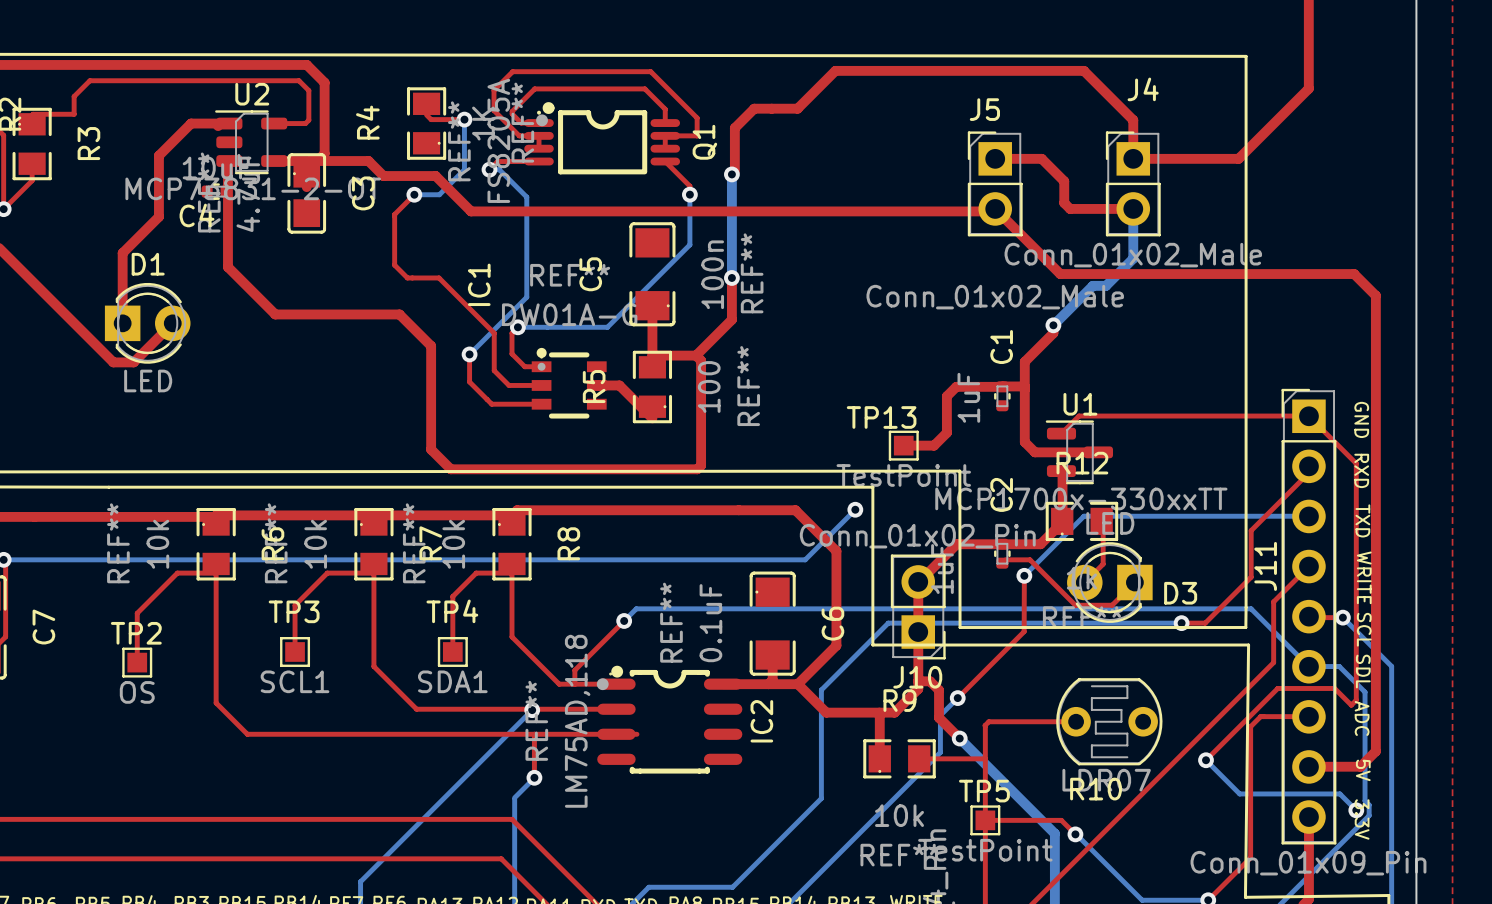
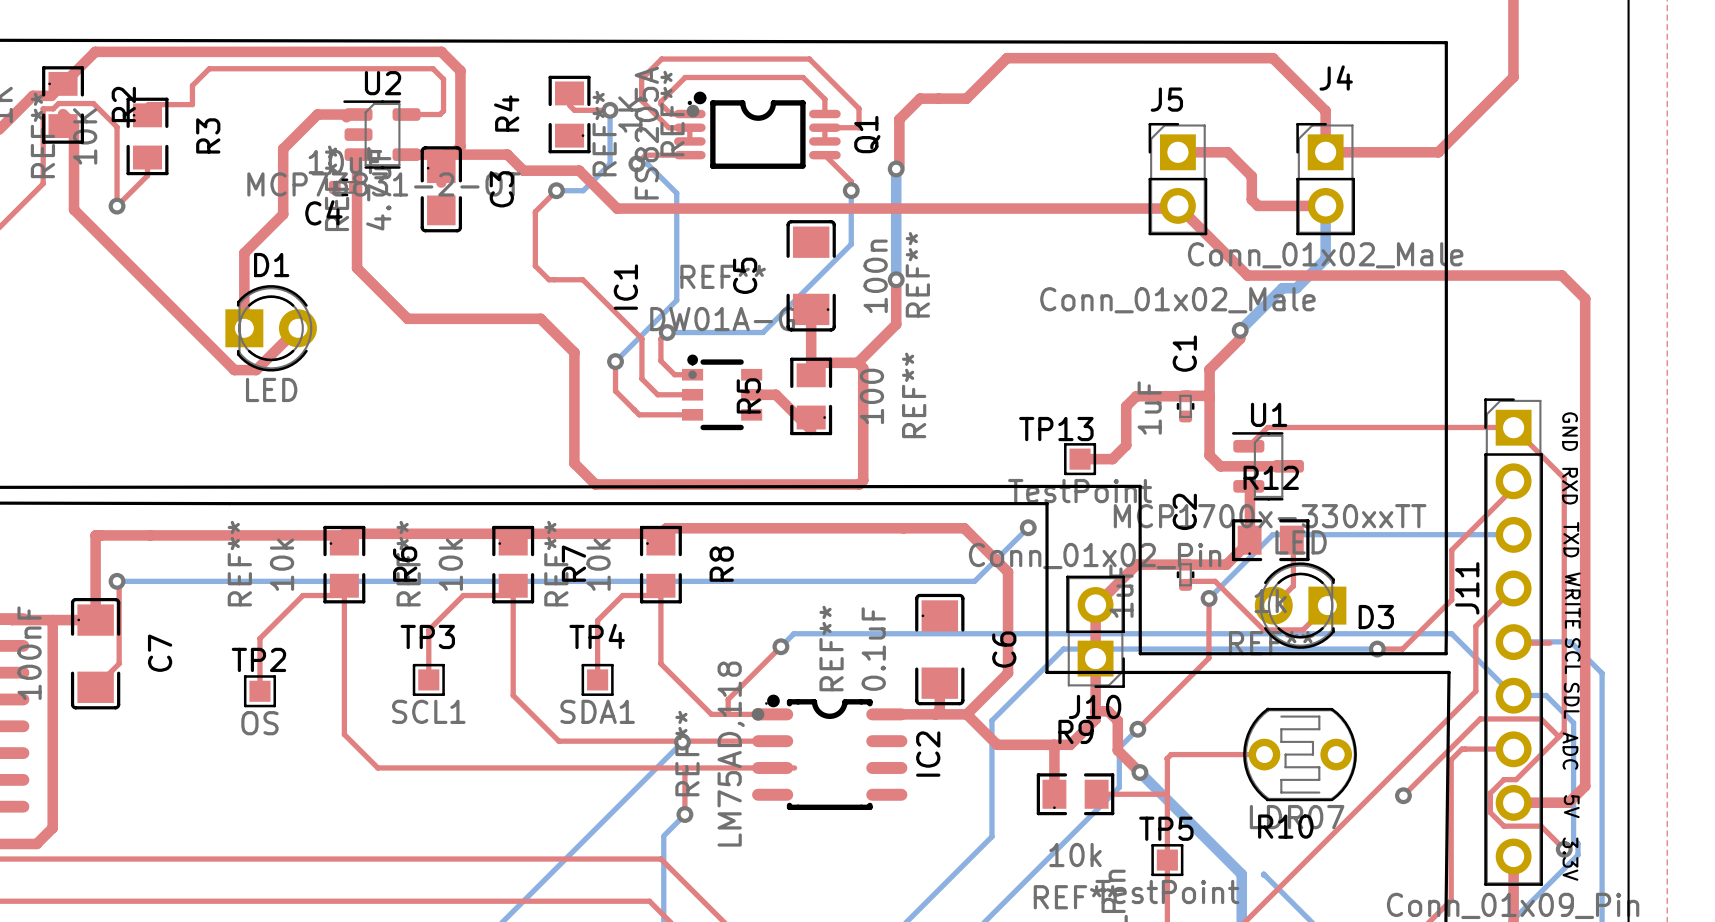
bottom track: (1342, 617) (1391, 666) -> (1513, 641) (1570, 641) (1602, 673) (1602, 695)
via: (1342, 617) -> none
top track: none -> (1558, 736) (1516, 779) (1503, 779) (1490, 793) (1490, 812) (1503, 826) (1541, 826) (1564, 849)
bottom track: (1206, 760) (1239, 793) (1339, 793) (1356, 810) -> none
top track: (985, 820) (1061, 820) (1075, 834) -> none
via: (1075, 834) -> none

